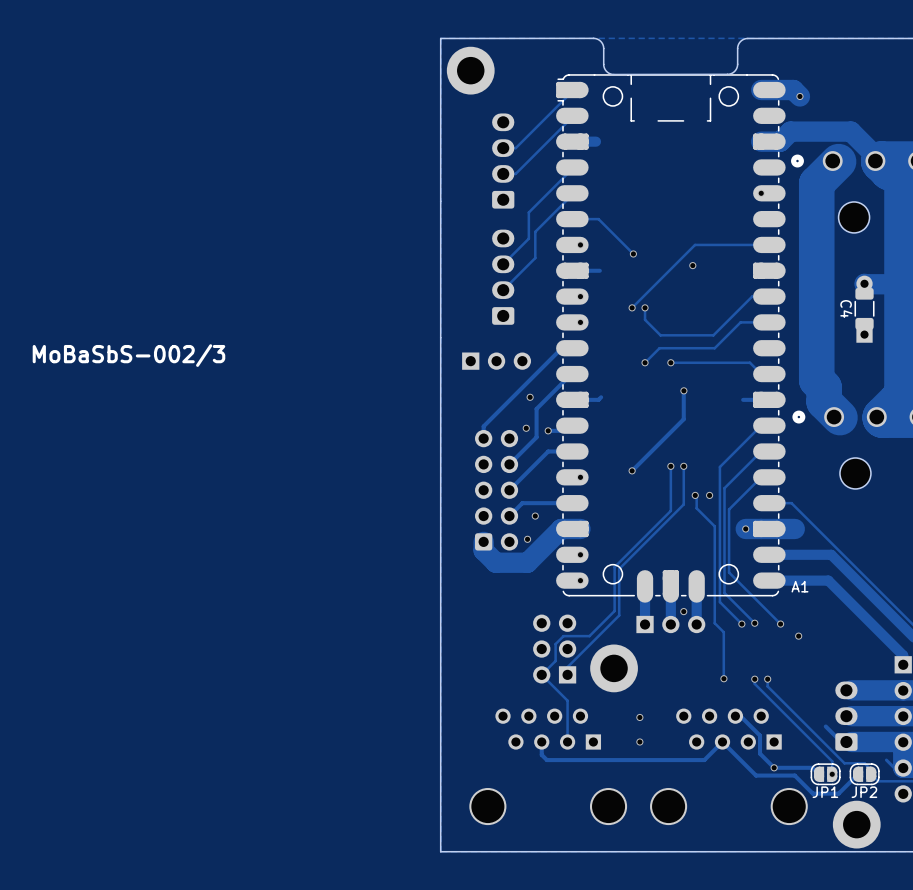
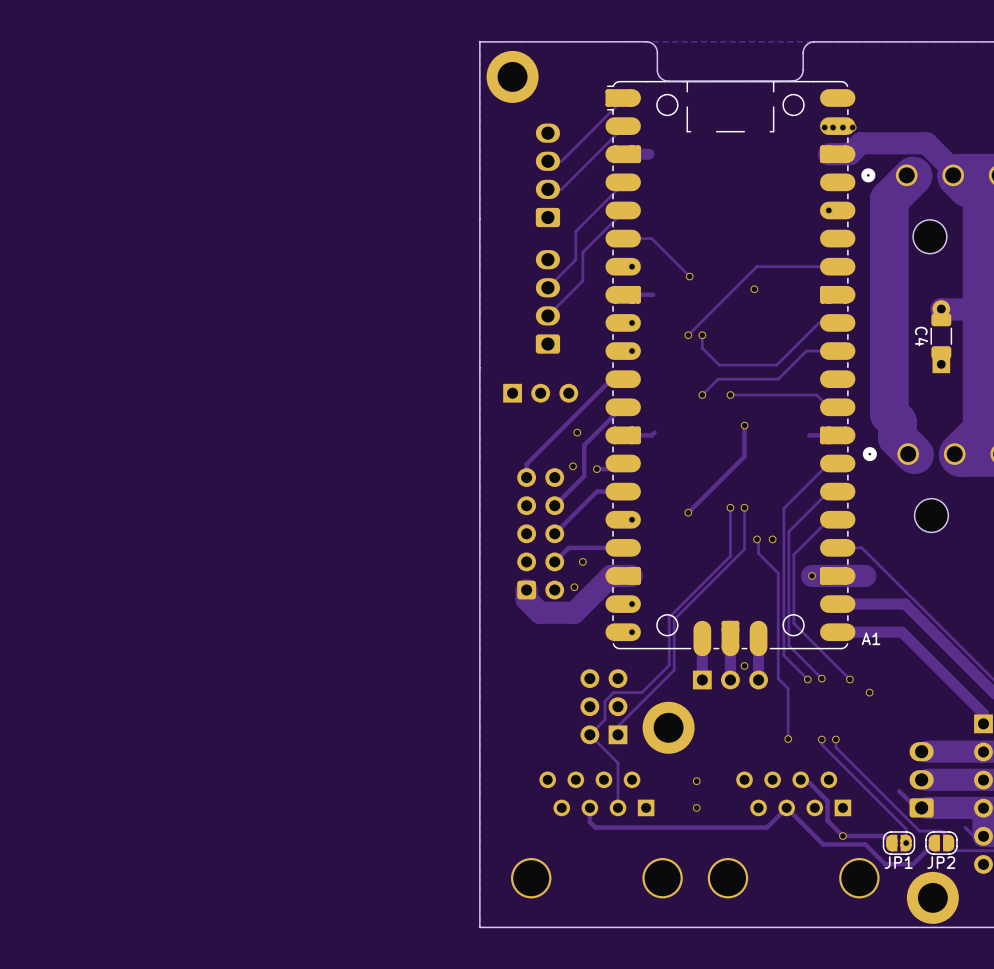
track: (761, 90) (793, 90) (799, 96) -> none
via: (799, 96) -> none
via: none -> (824, 127)
via: none -> (833, 127)
via: none -> (842, 127)
via: none -> (852, 127)
text: MoBaSbS-002/3 (128, 355) -> none

